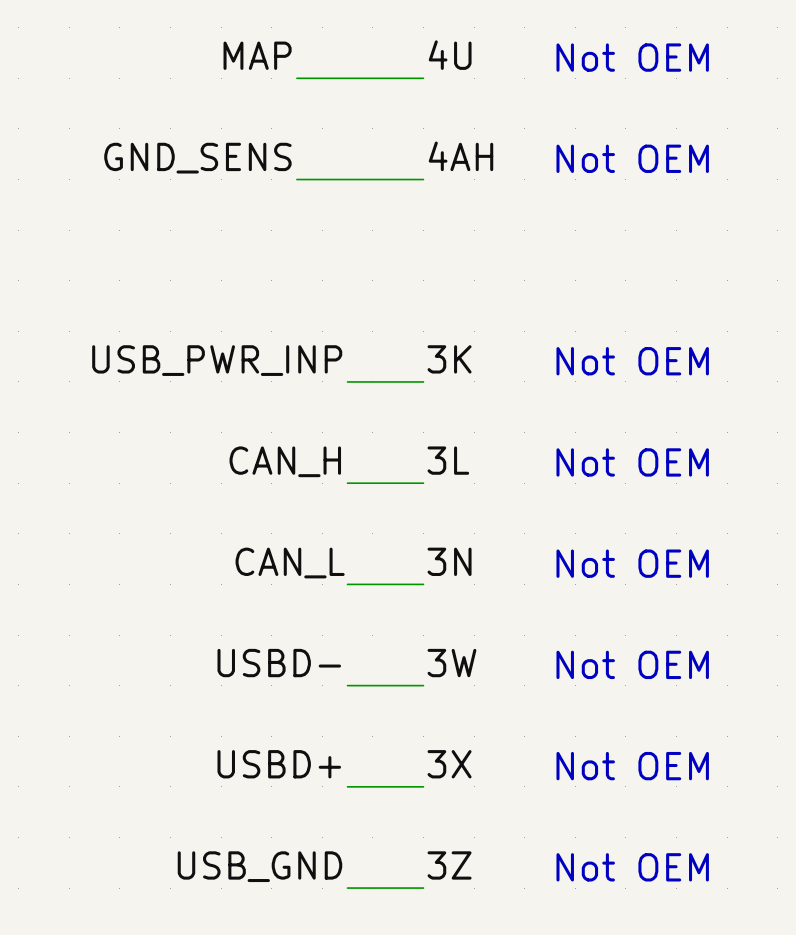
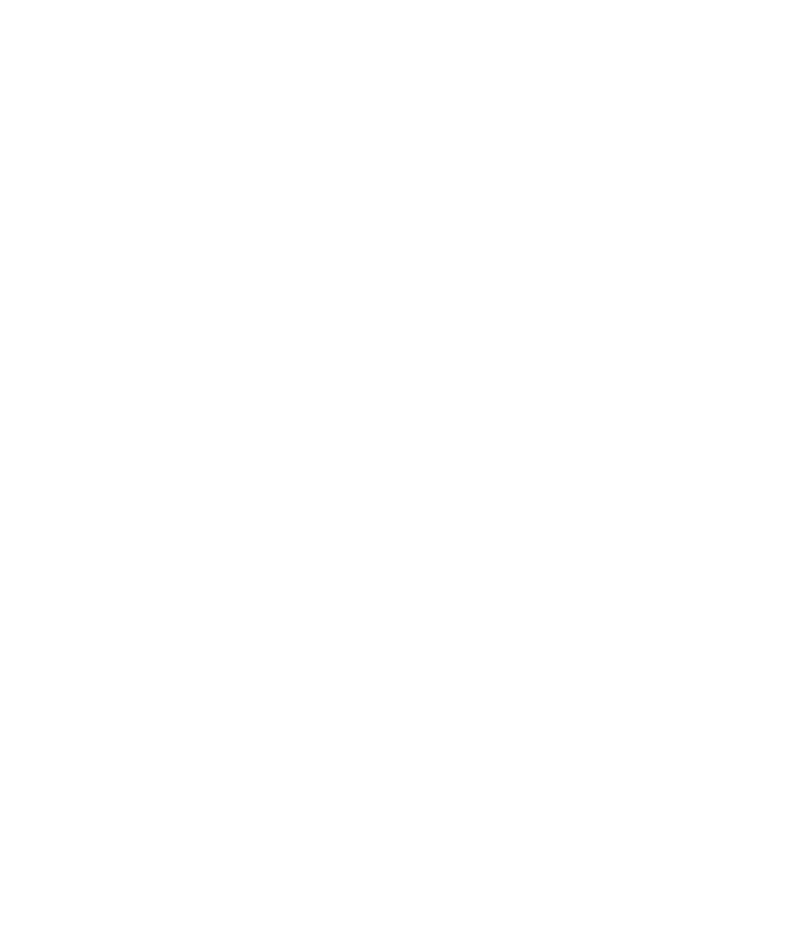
label: MAP (257, 55) -> none
label: 4U (450, 55) -> none
text: Not OEM (632, 57) -> none
wire: (296, 78) (423, 78) -> none
label: 4AH (460, 156) -> none
label: GND_SENS (197, 158) -> none
text: Not OEM (632, 158) -> none
wire: (296, 179) (423, 179) -> none
label: 3K (449, 359) -> none
label: USB_PWR_INP (217, 360) -> none
text: Not OEM (632, 361) -> none
wire: (347, 381) (423, 381) -> none
label: 3L (448, 460) -> none
label: CAN_H (285, 461) -> none
text: Not OEM (632, 462) -> none
wire: (347, 483) (423, 483) -> none
label: 3N (449, 561) -> none
label: CAN_L (290, 563) -> none
text: Not OEM (632, 563) -> none
wire: (347, 584) (423, 584) -> none
label: USBD- (279, 663) -> none
label: 3W (451, 663) -> none
text: Not OEM (632, 664) -> none
wire: (347, 685) (423, 685) -> none
label: USBD+ (279, 764) -> none
label: 3X (449, 764) -> none
text: Not OEM (632, 766) -> none
wire: (347, 786) (423, 786) -> none
label: 3Z (449, 865) -> none
label: USB_GND (259, 866) -> none
text: Not OEM (632, 867) -> none
wire: (347, 888) (423, 888) -> none

